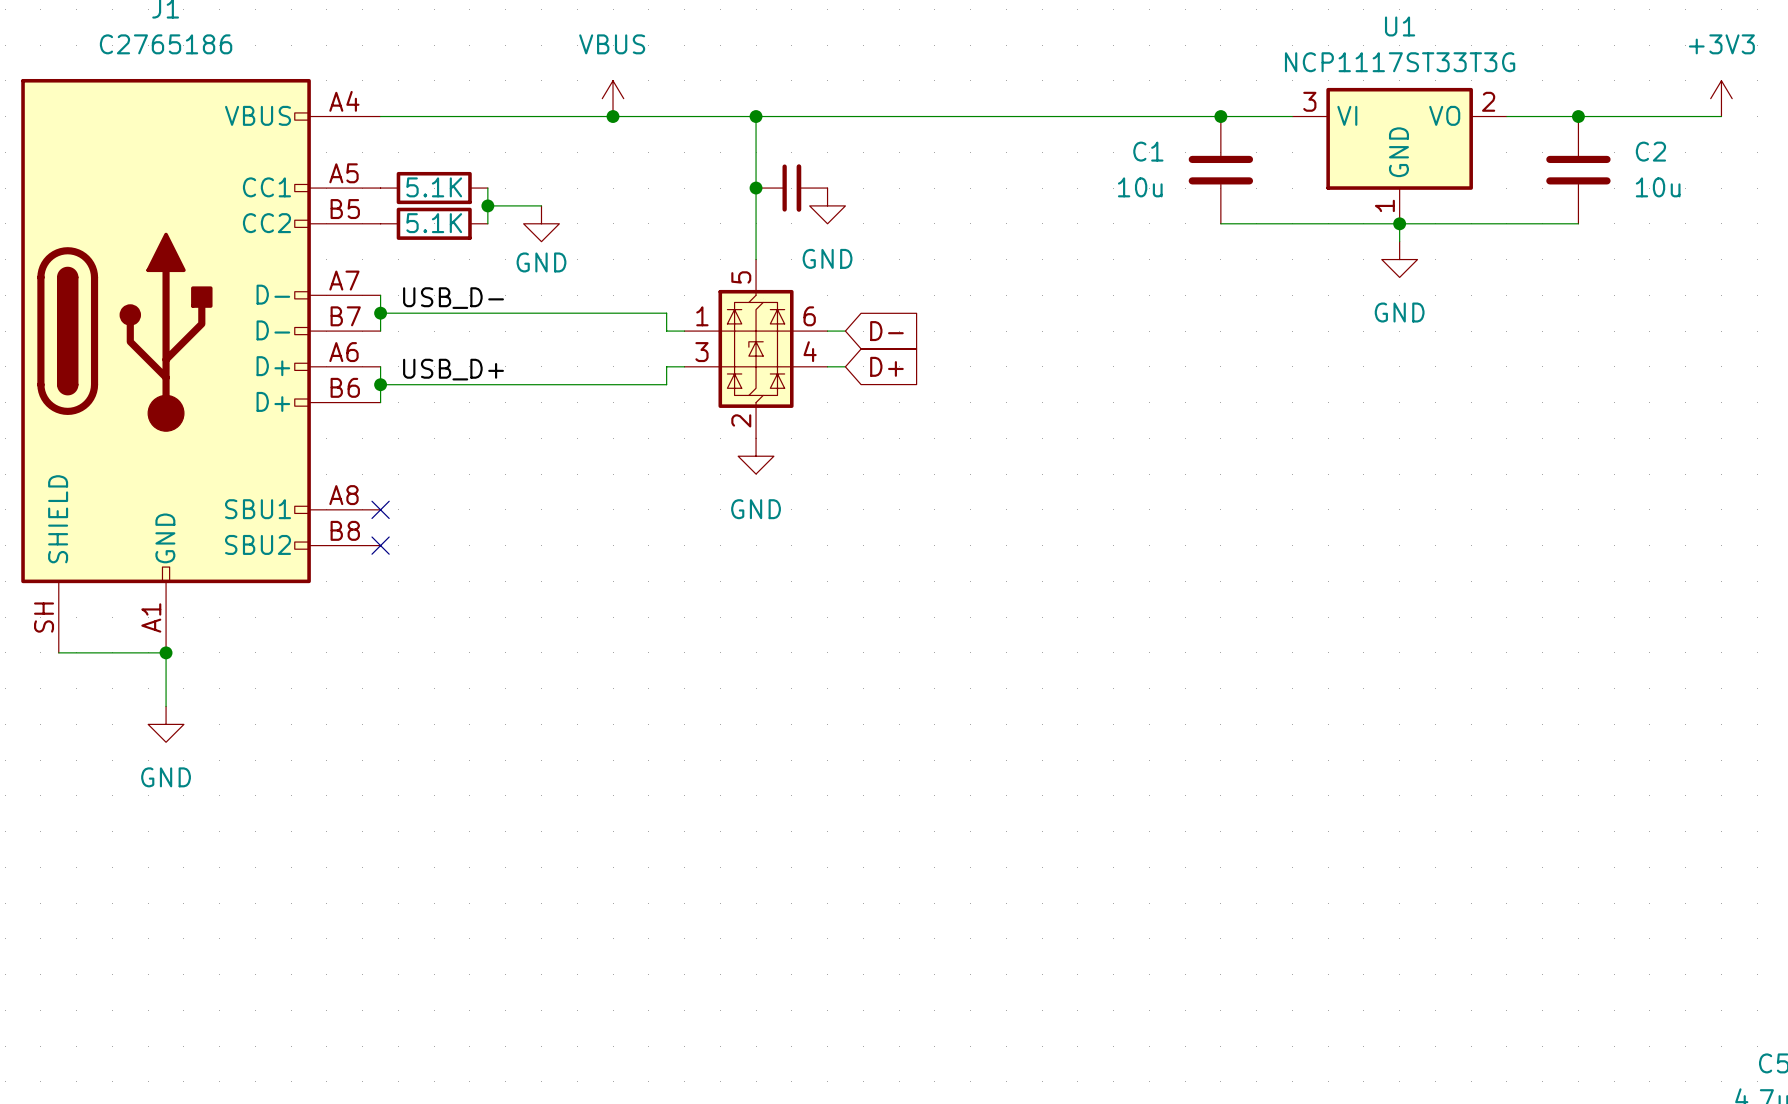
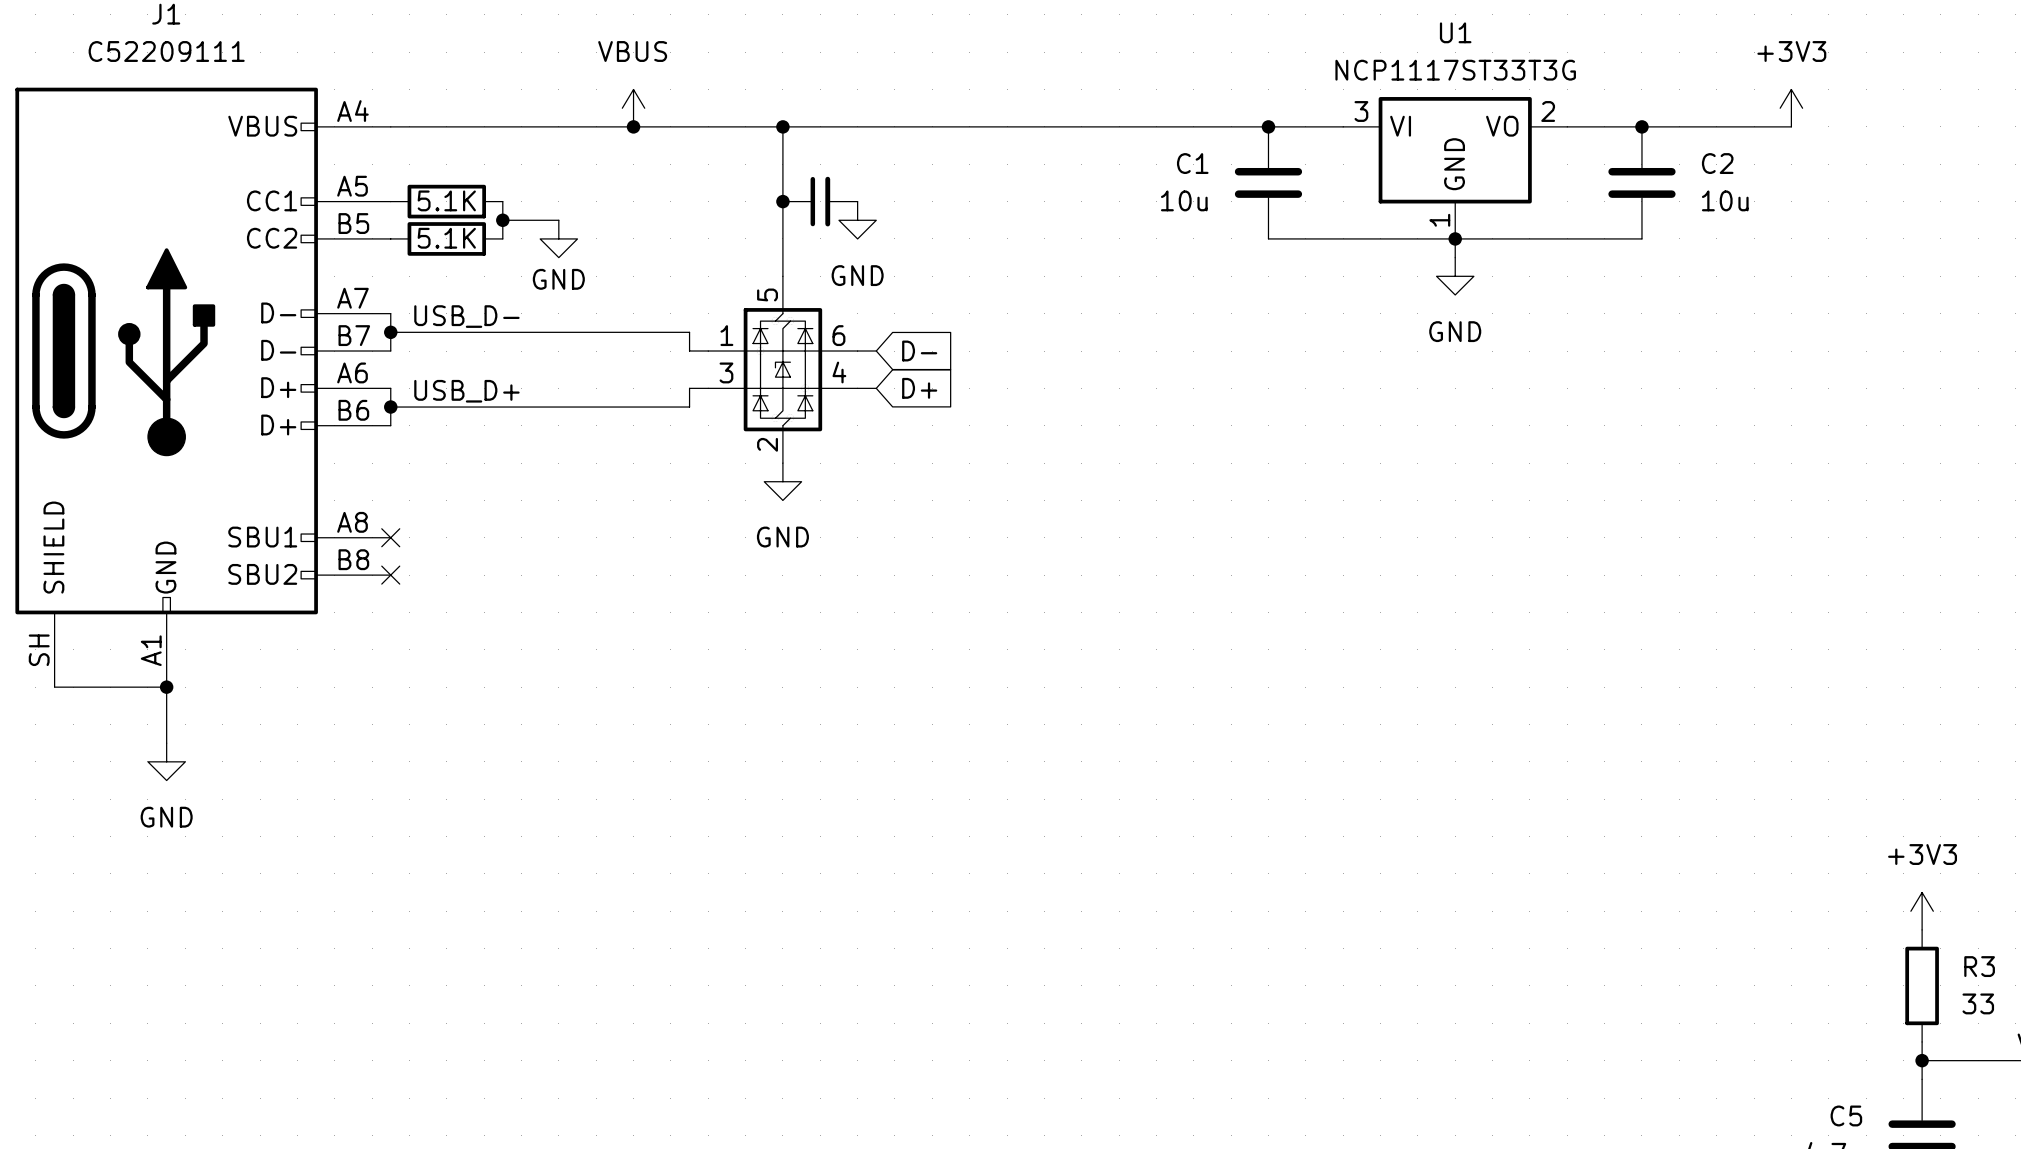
J1 value: C2765186 (166, 44) -> C52209111 (166, 51)

